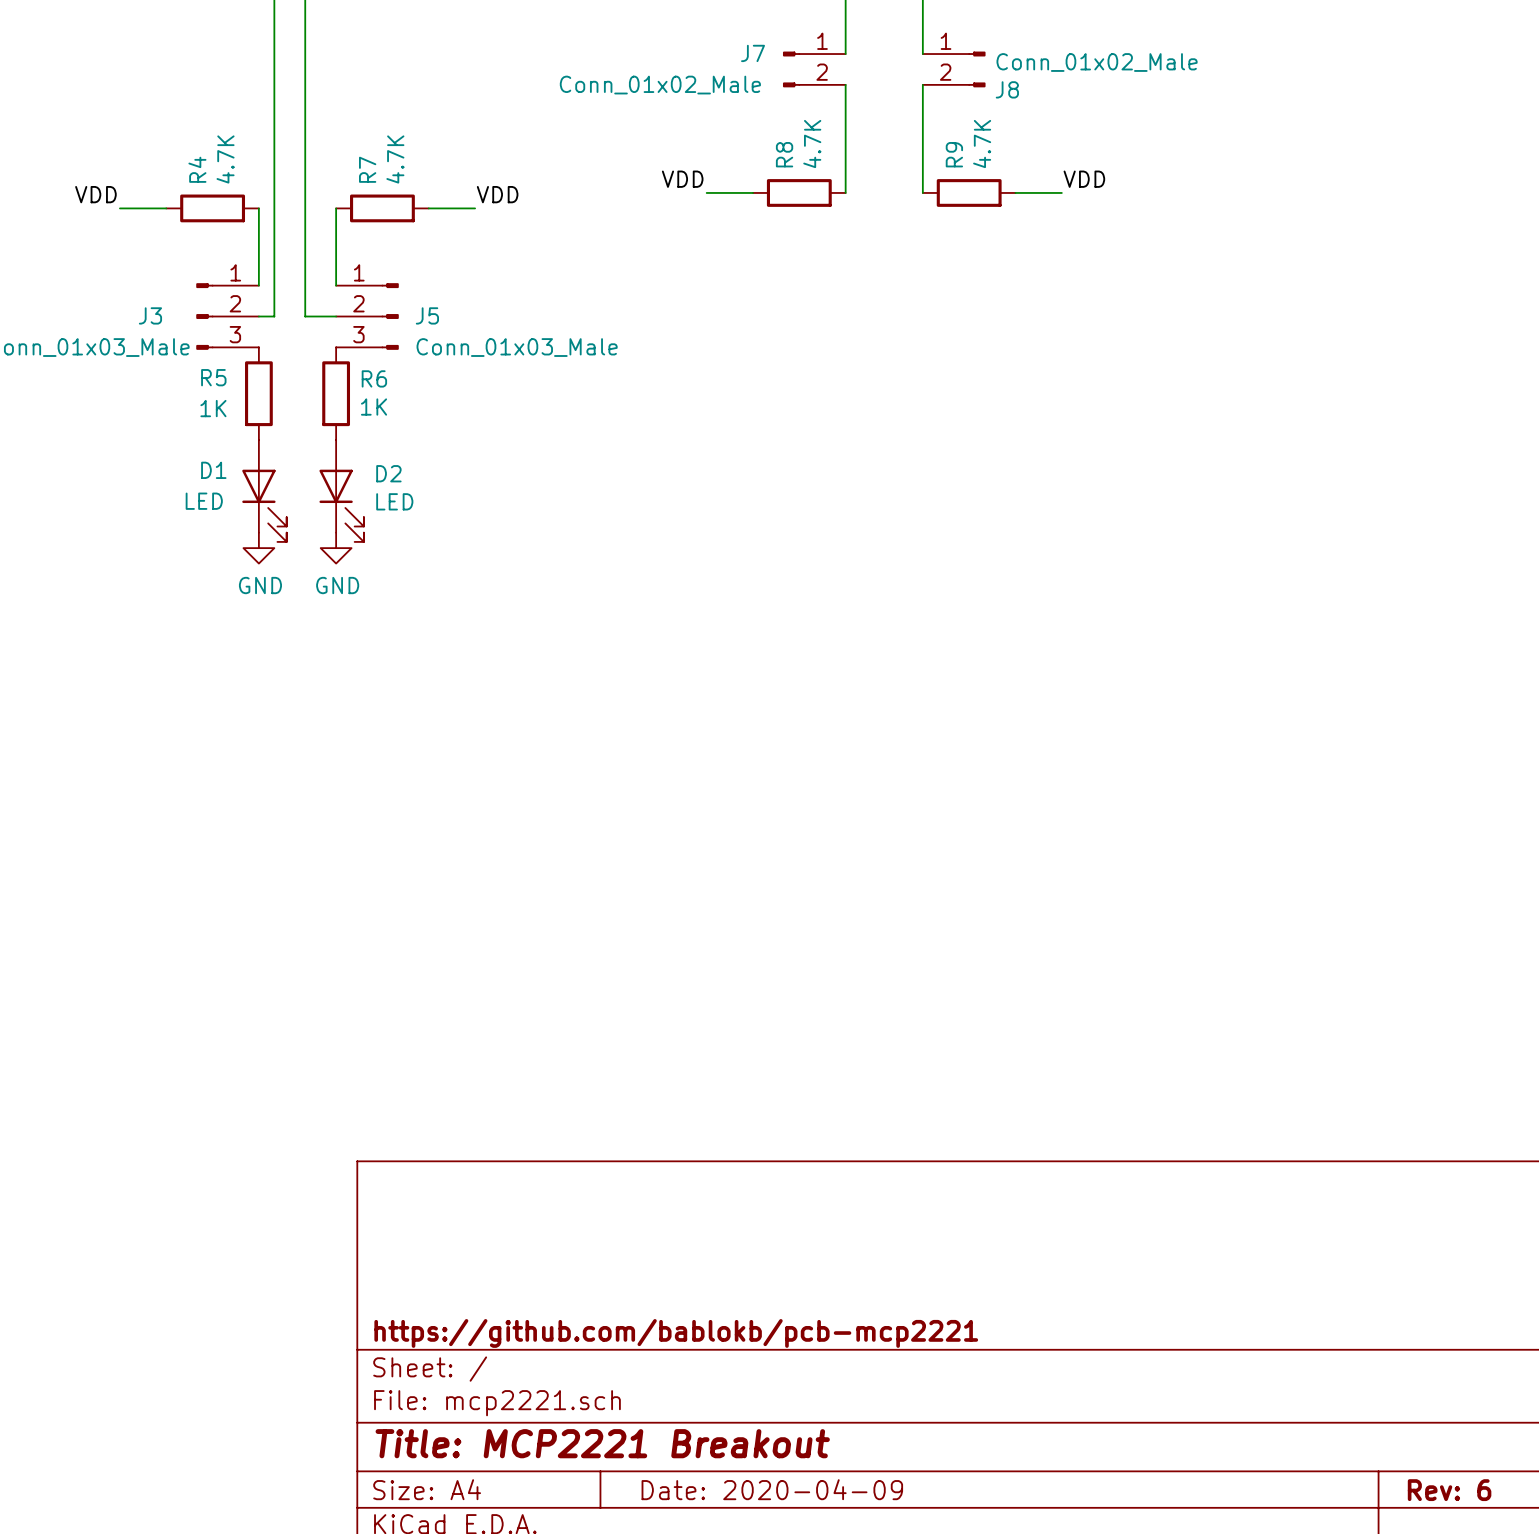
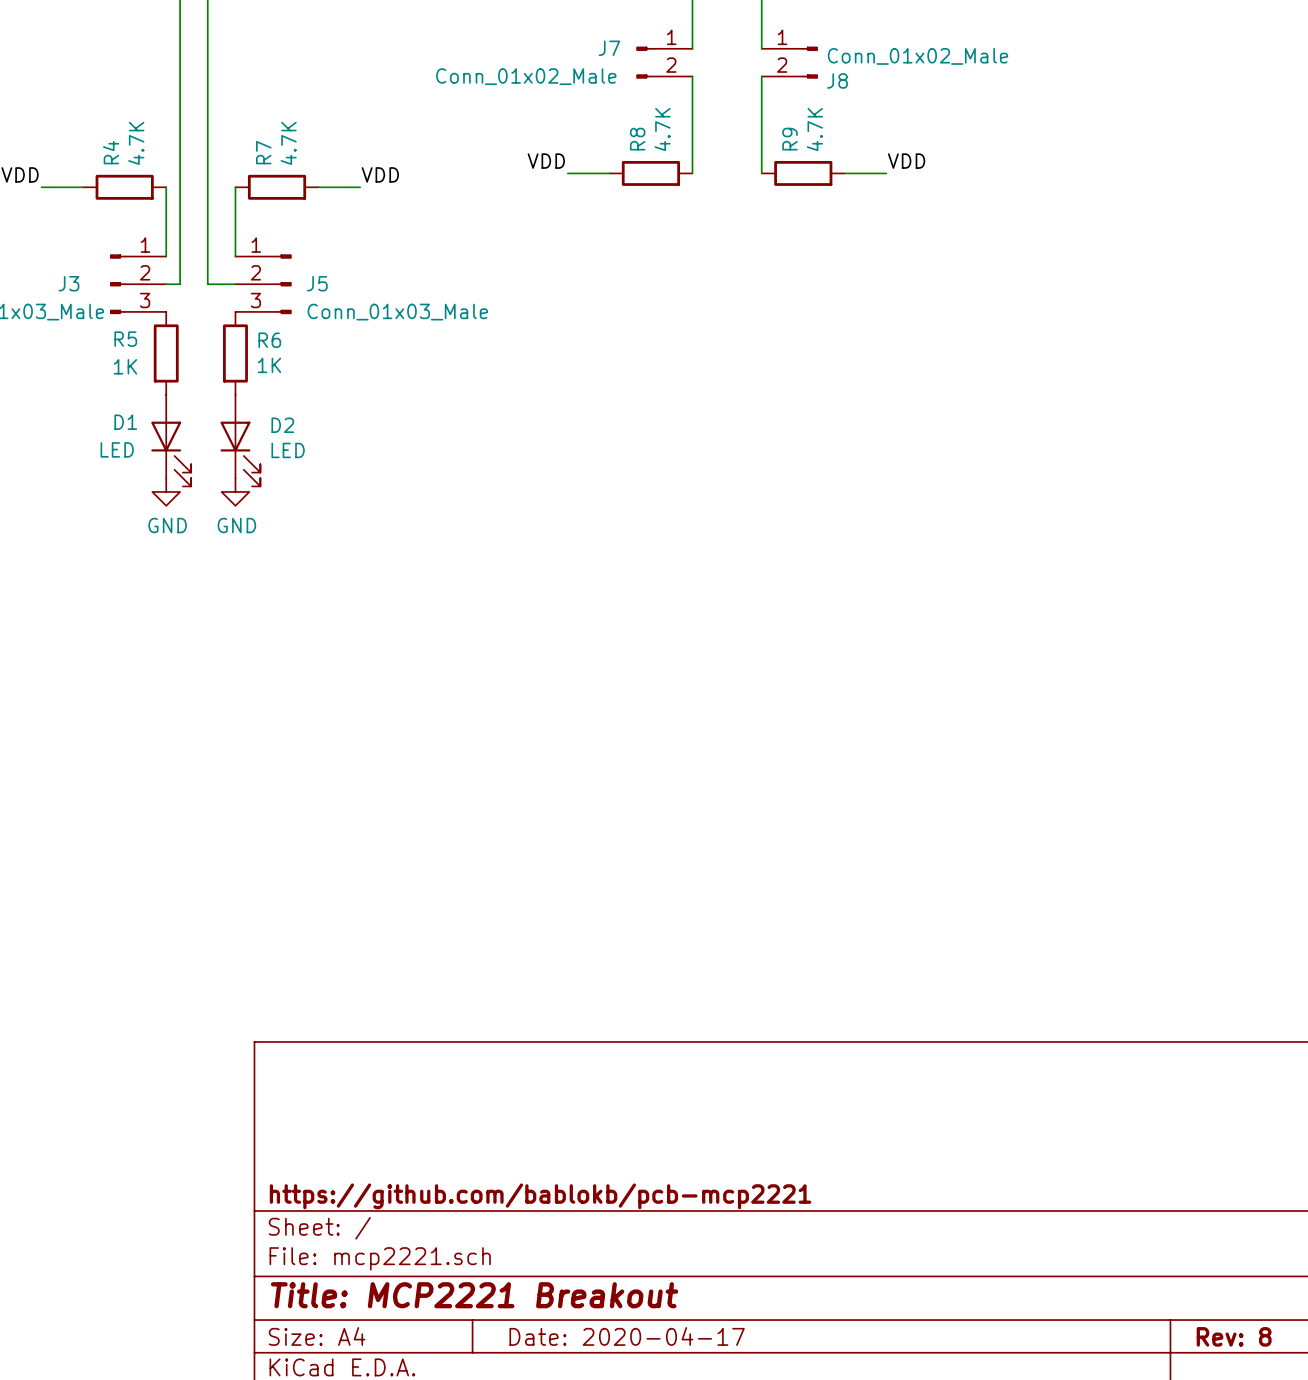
title block: Date: 2020-04-09 (772, 1489) -> Date: 2020-04-17 (627, 1336)
title block: Rev: 6 (1449, 1490) -> Rev: 8 (1234, 1336)

